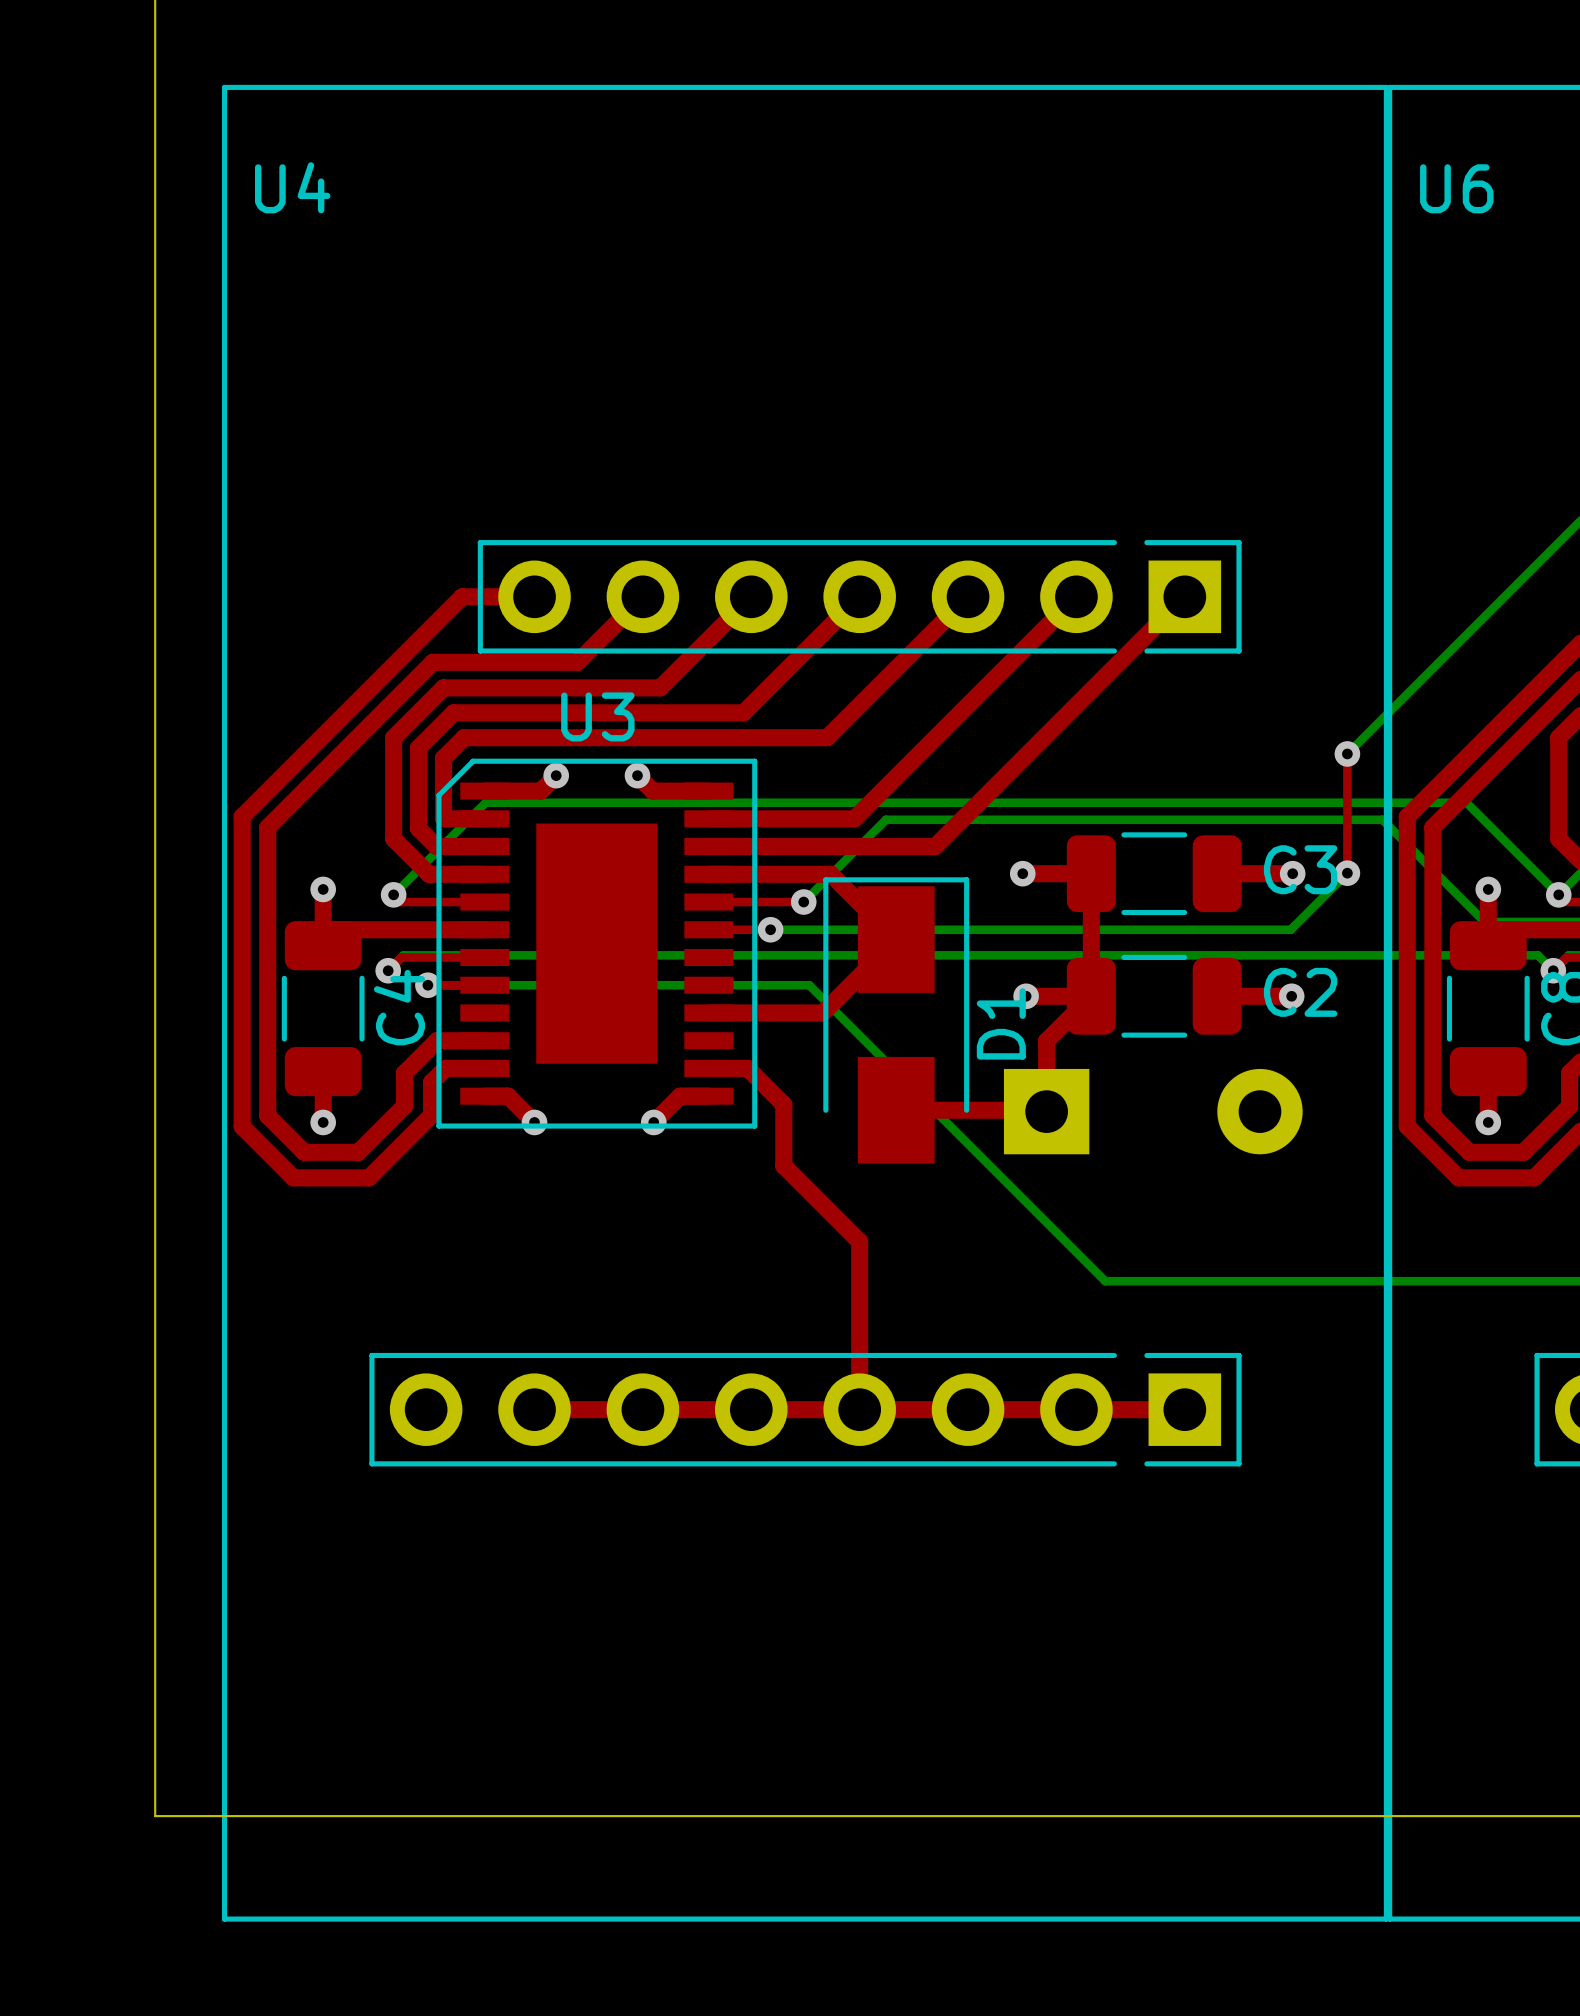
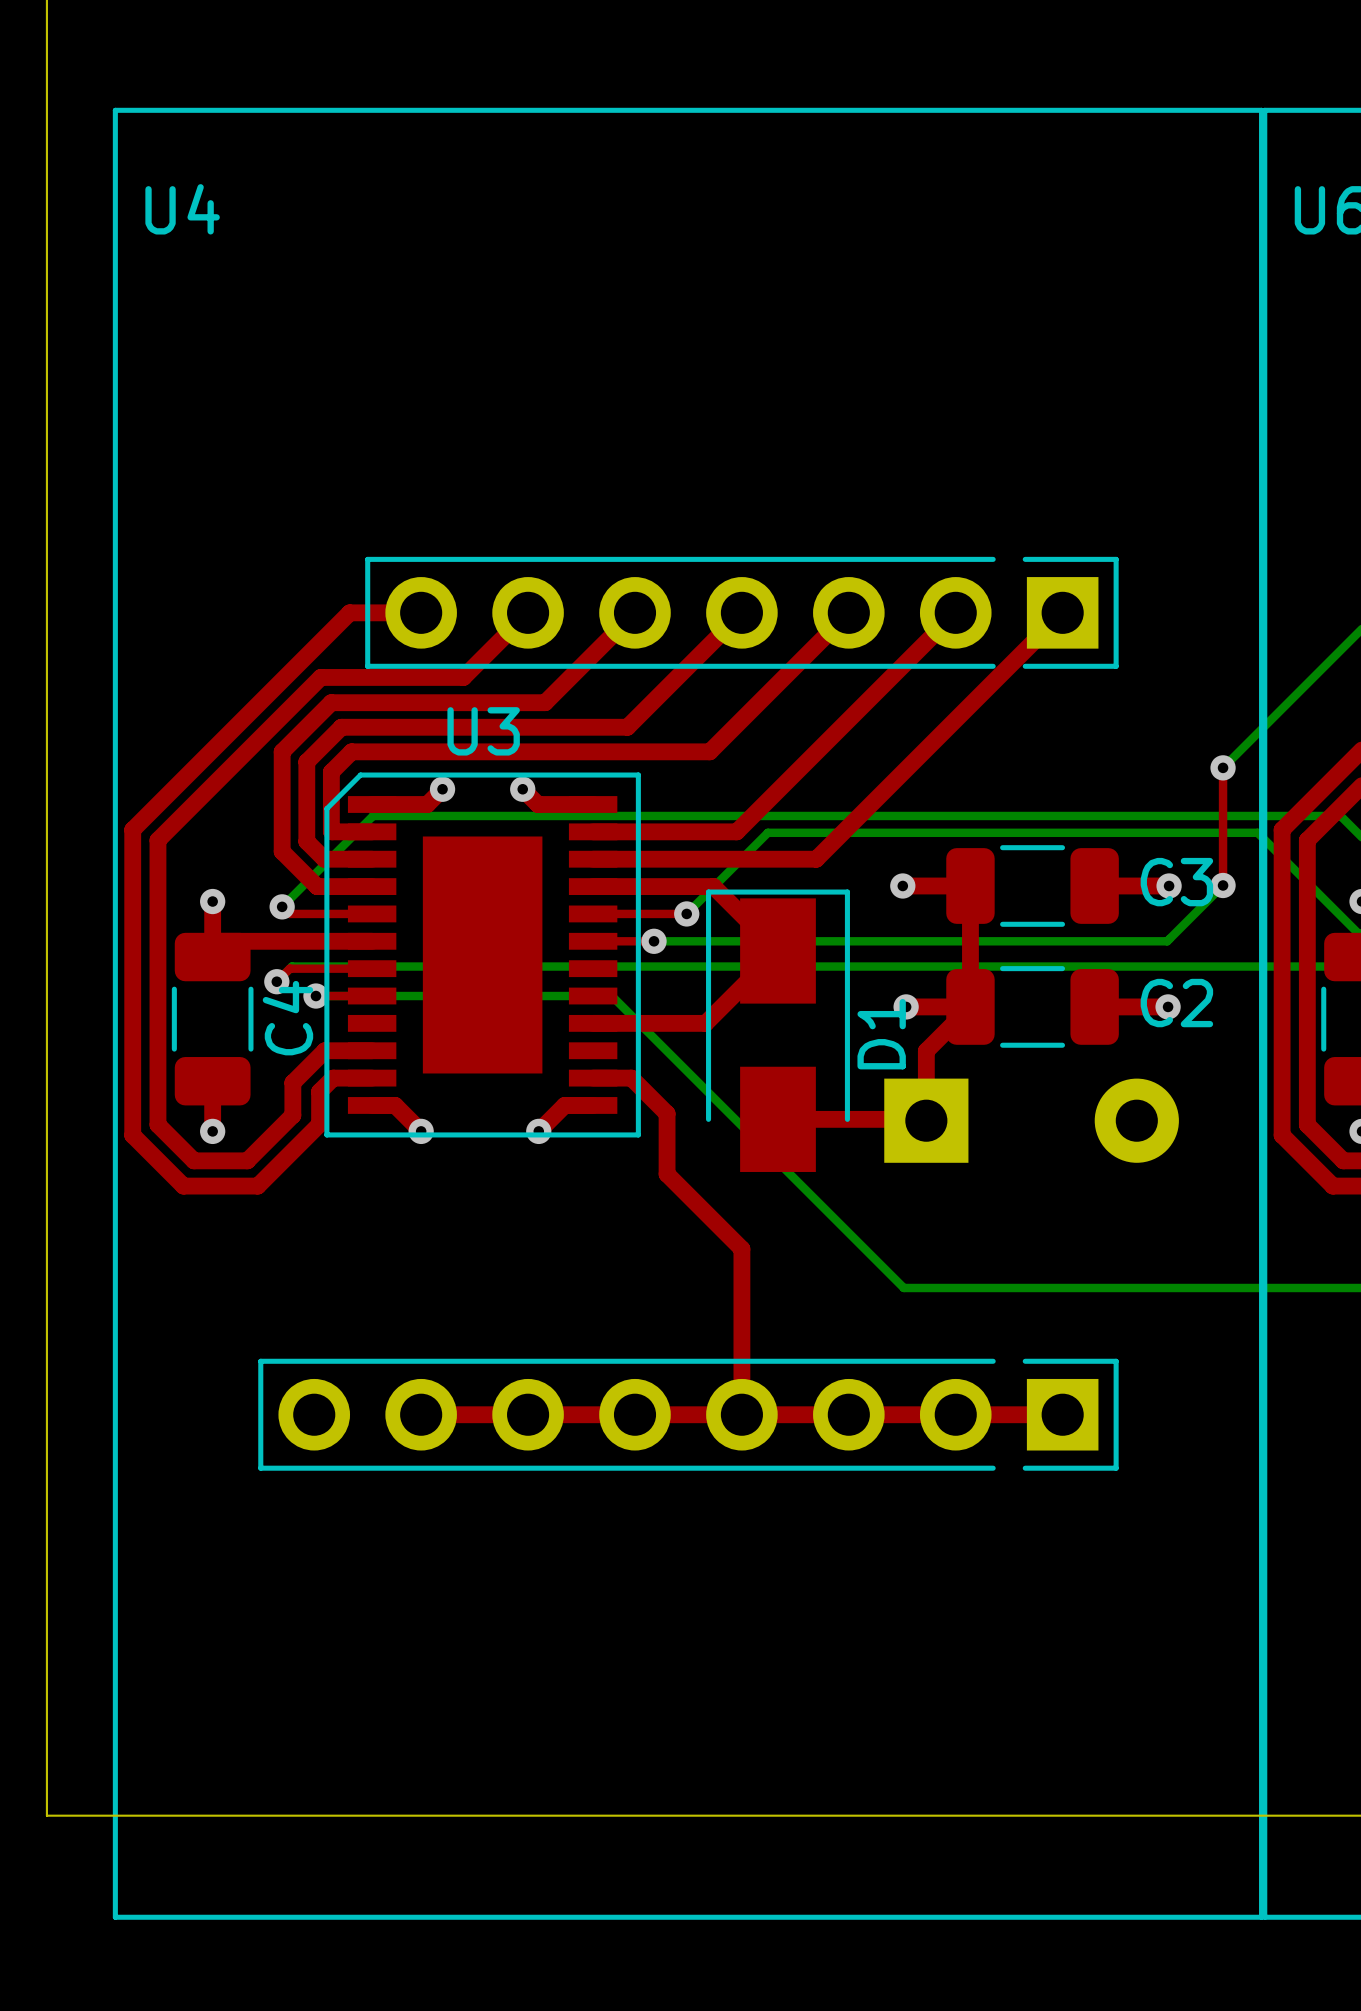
bottom track: (727, 985) (809, 985) (1105, 1281) -> (611, 996) (903, 1287) (984, 1287)

